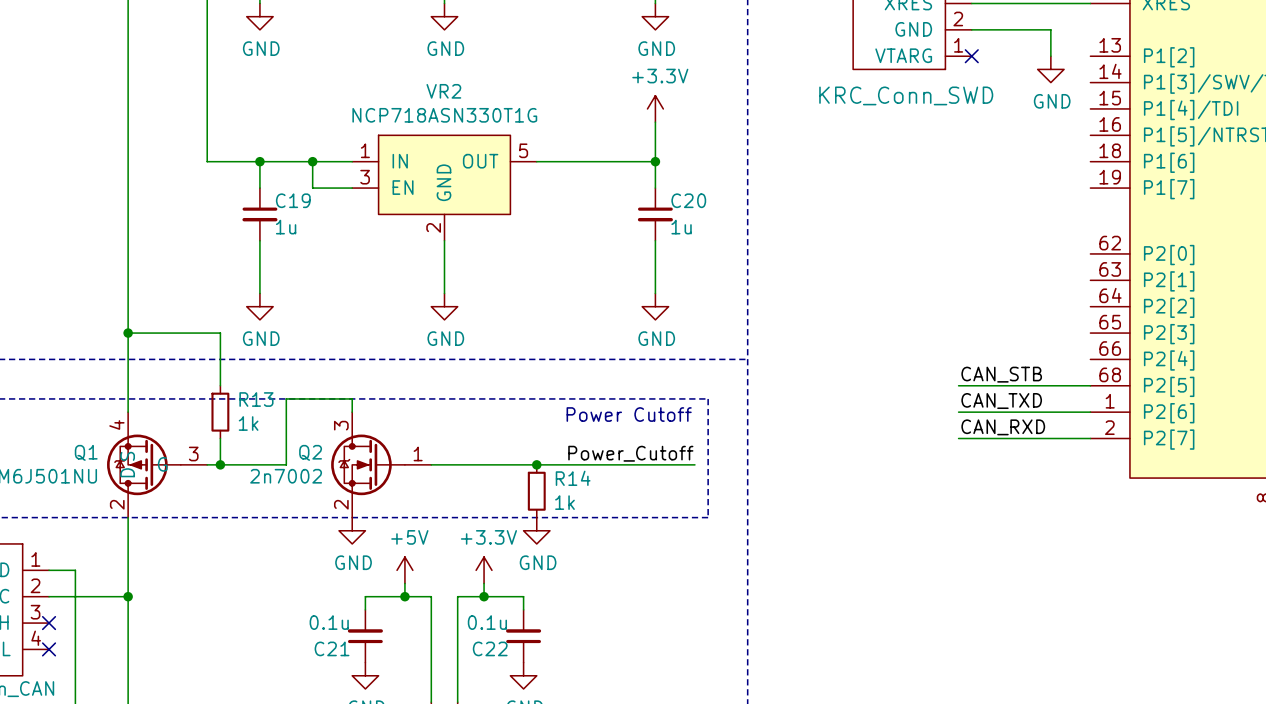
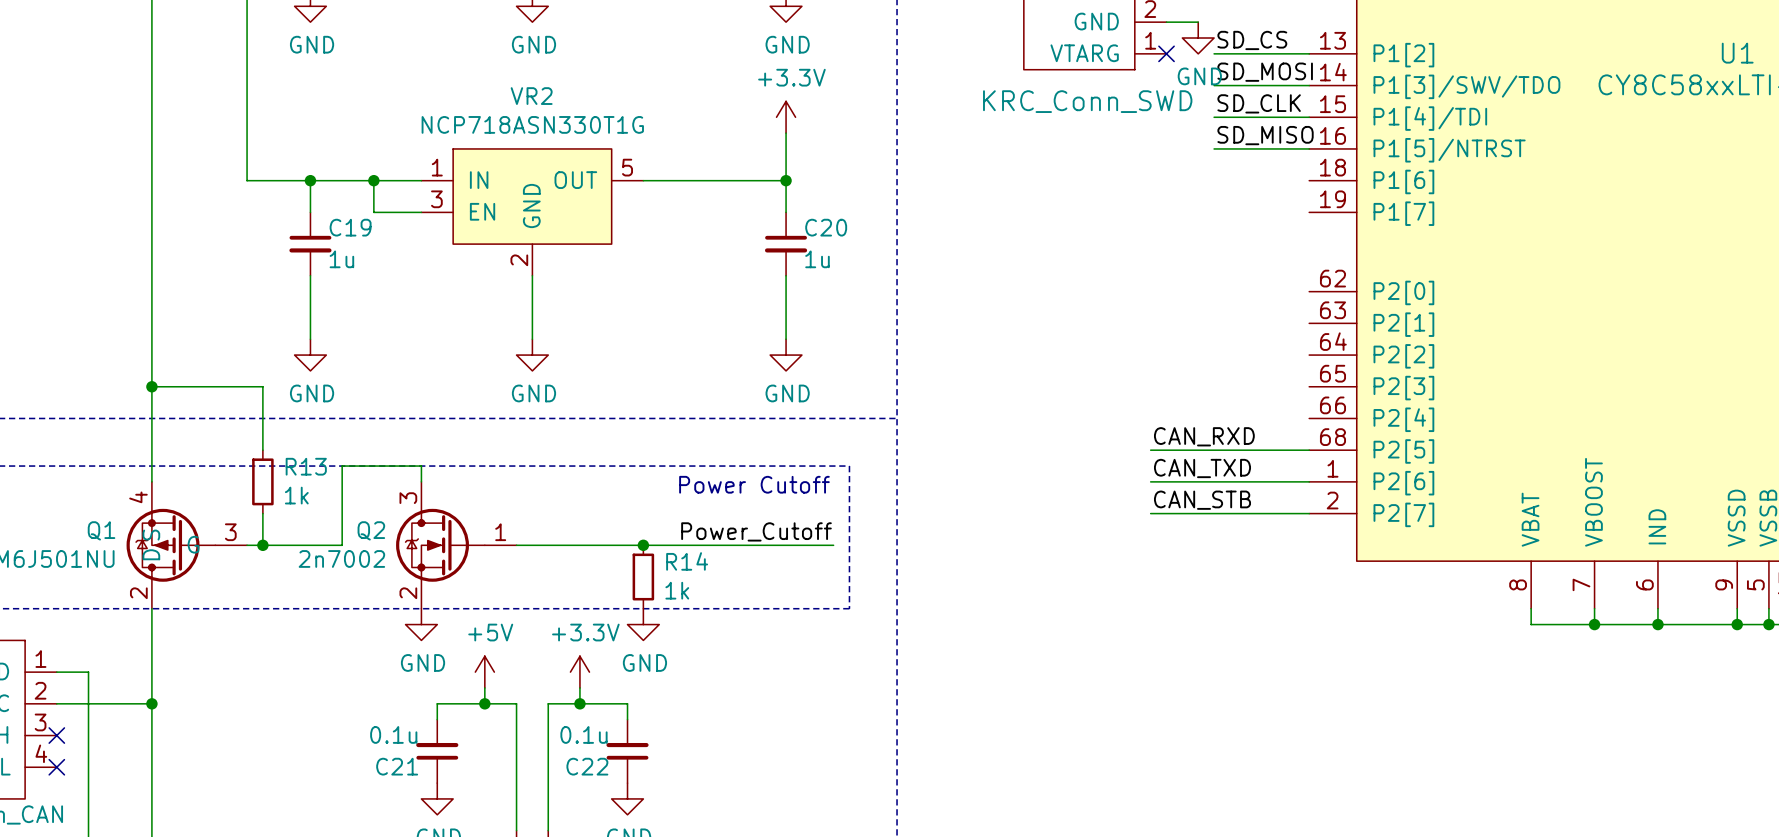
wire: (998, 29) (1050, 29) (1050, 56) -> none
label: none -> SD_CS (1252, 40)
wire: none -> (1214, 53) (1309, 53)
power symbol position: GND (1050, 69) -> GND (1198, 38)
label: none -> SD_MOSI (1265, 72)
wire: none -> (1214, 85) (1309, 85)
label: none -> SD_CLK (1259, 103)
wire: none -> (1214, 117) (1309, 117)
label: none -> SD_MISO (1265, 135)
wire: none -> (1214, 148) (1309, 148)
label: CAN_STB (1001, 374) -> CAN_RXD (1204, 436)
label: CAN_RXD (1003, 427) -> CAN_STB (1202, 500)

